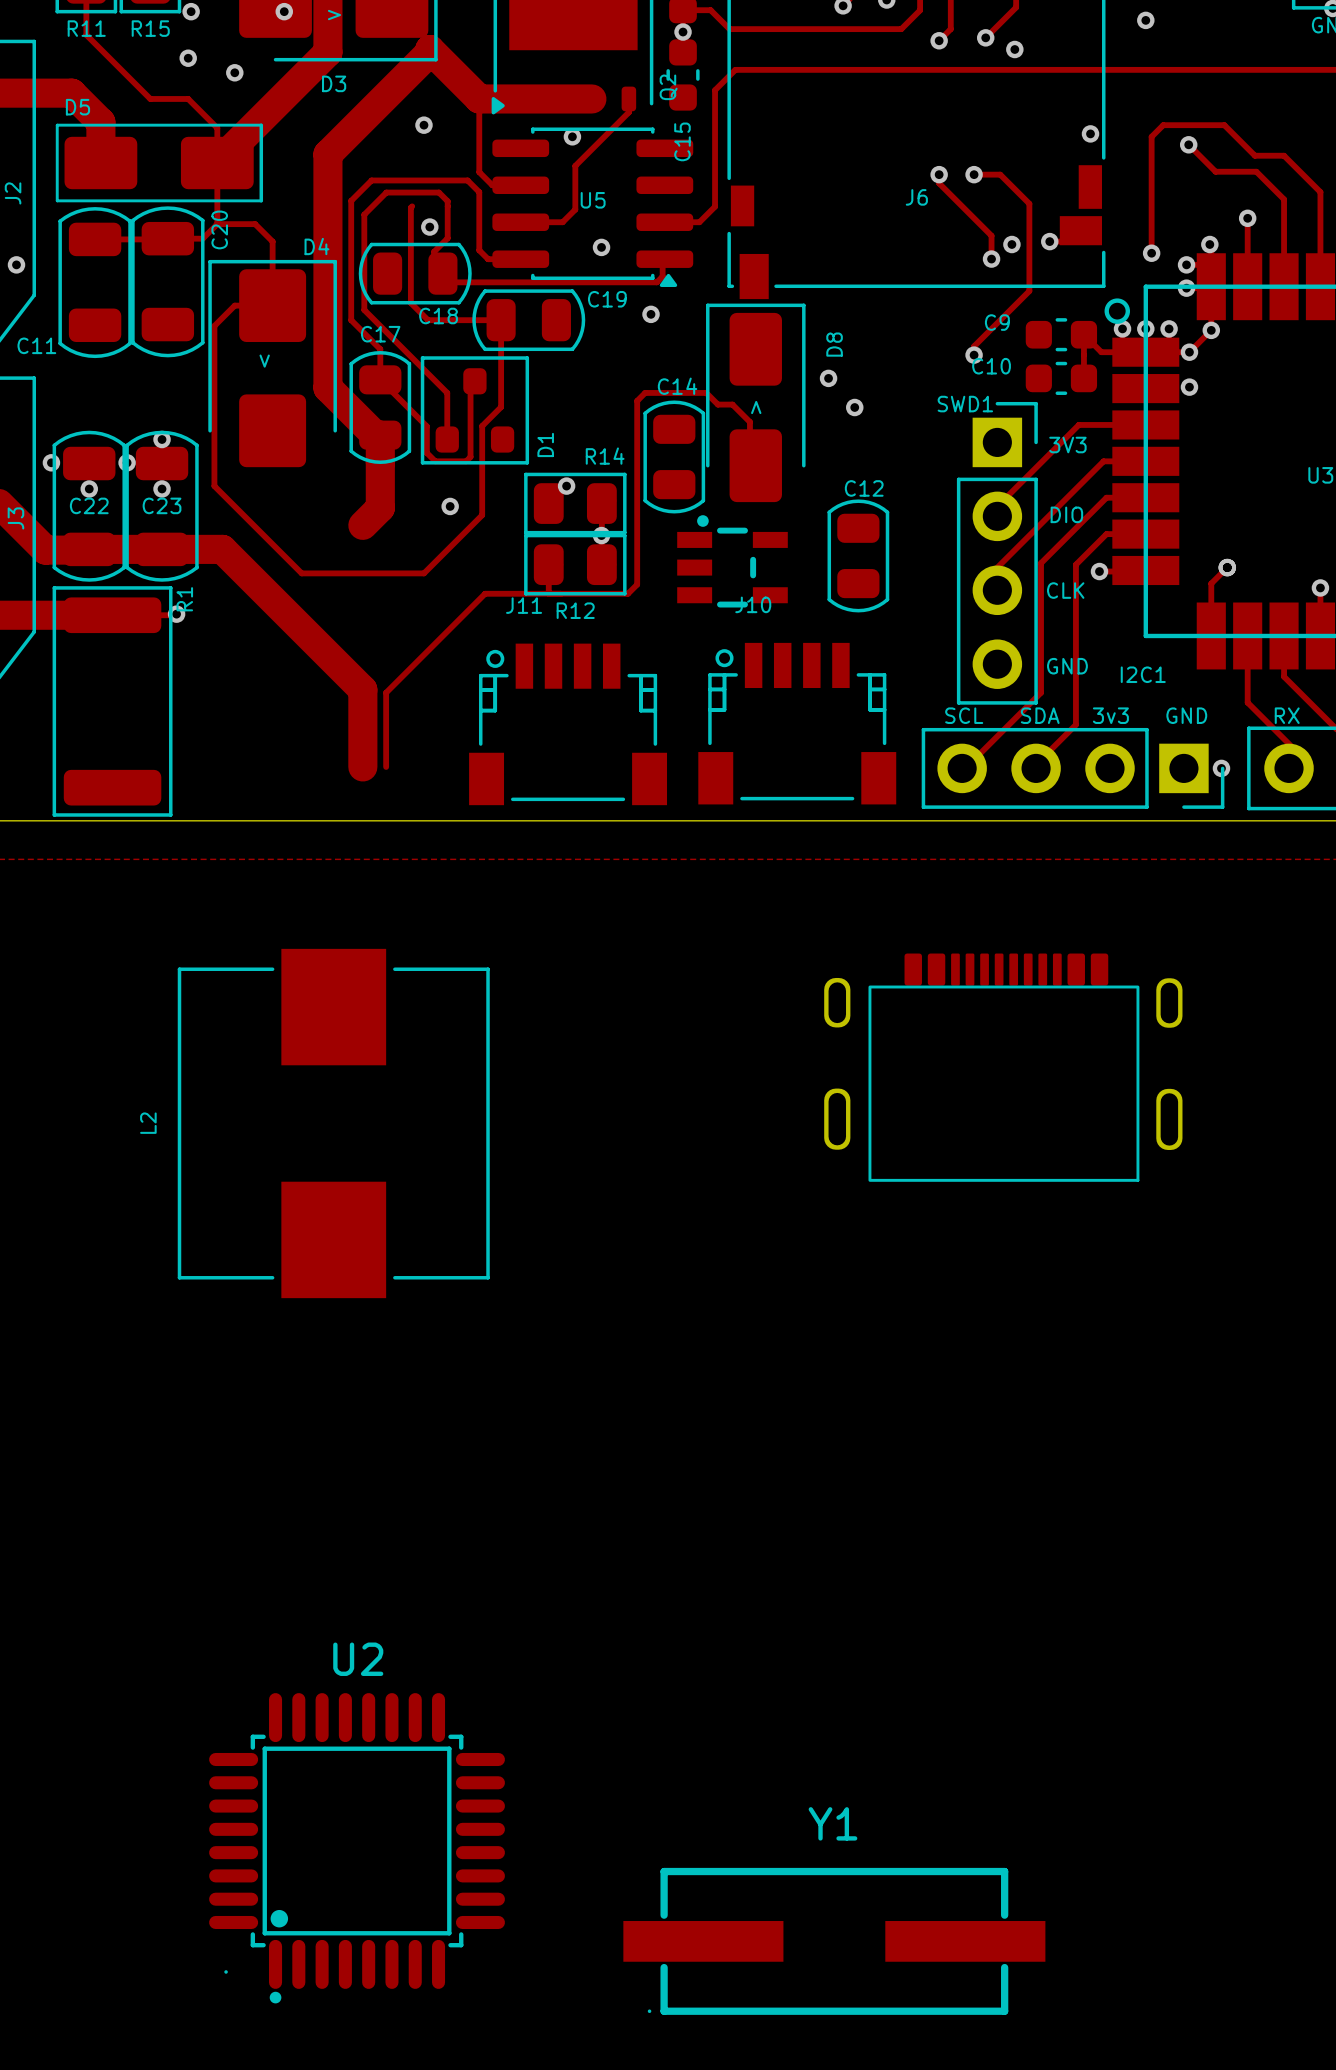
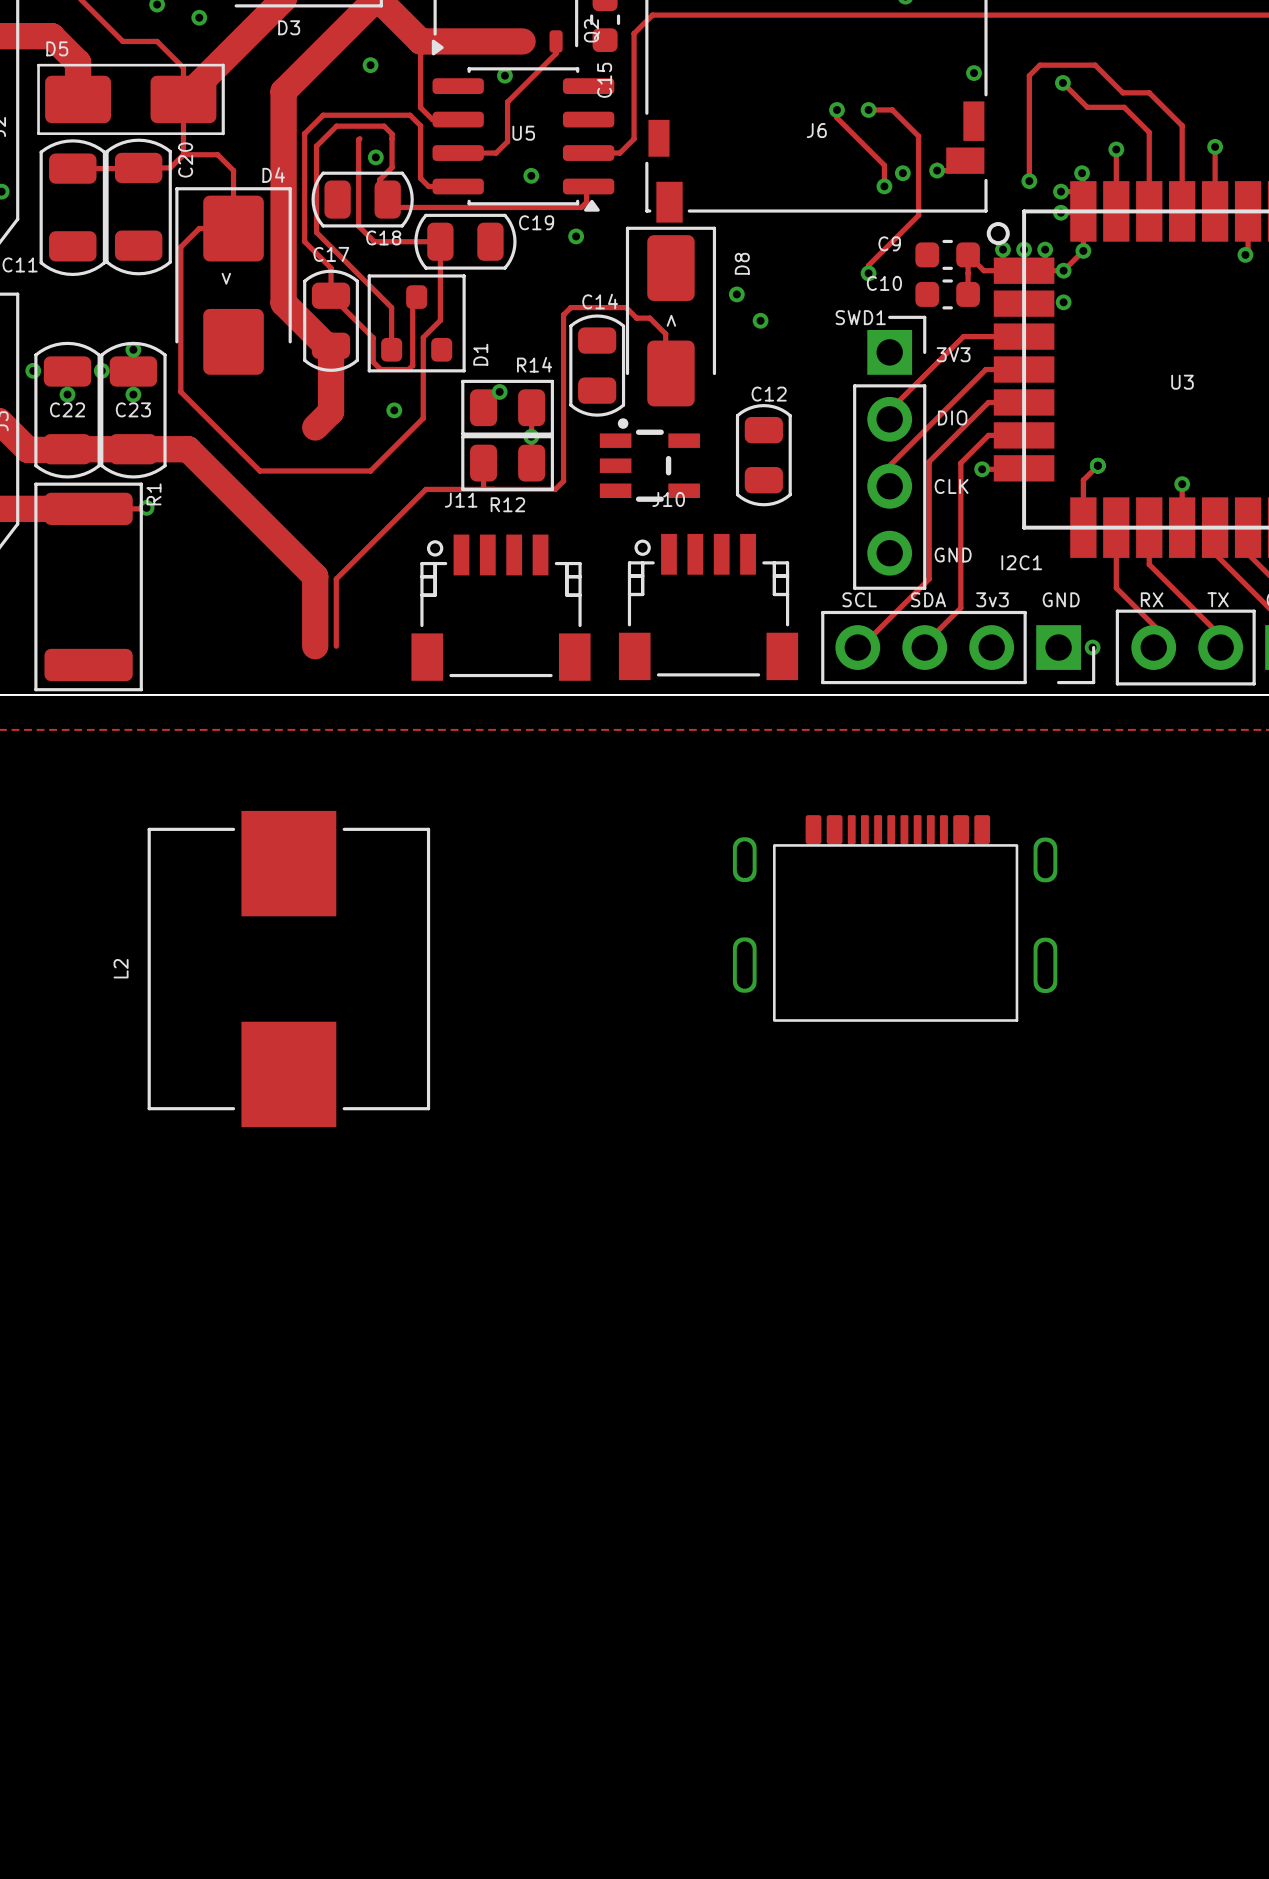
U2: (357, 1848) -> none
Y1: (834, 1941) -> none

